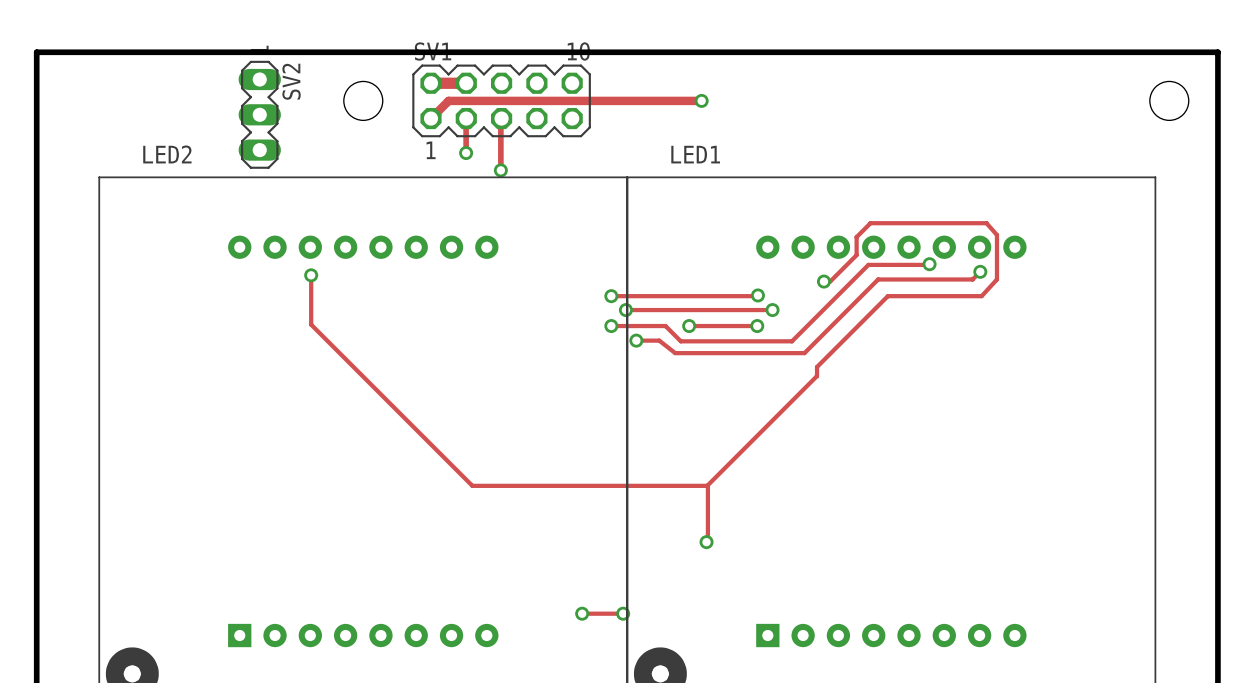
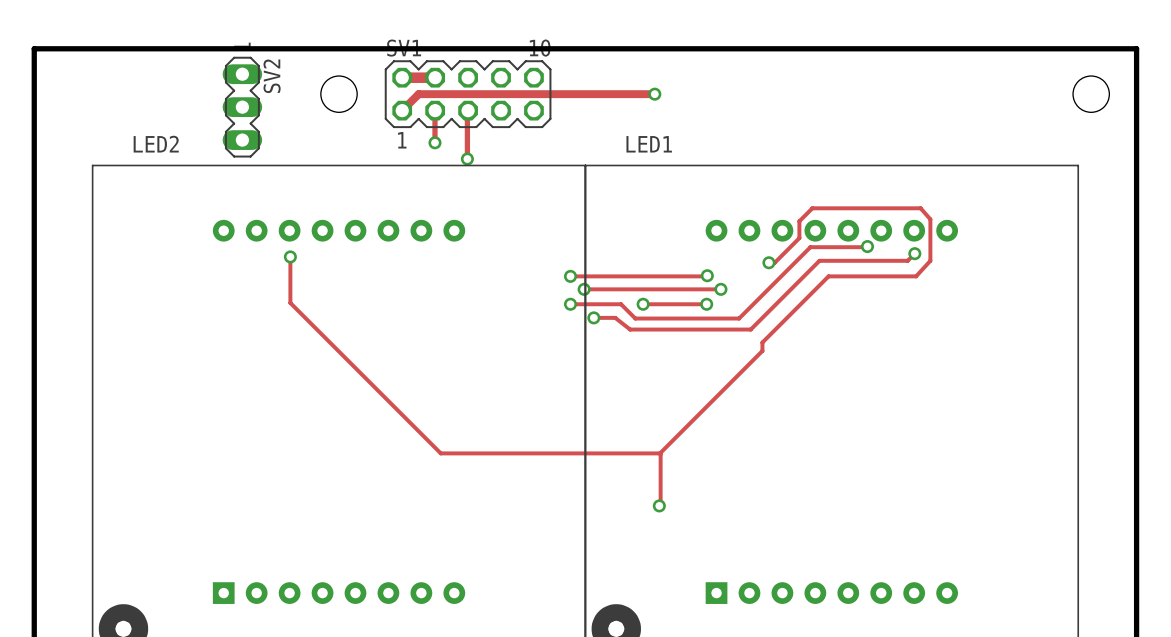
track: (582, 613) (623, 613) -> none
via: (582, 613) -> none
via: (623, 613) -> none

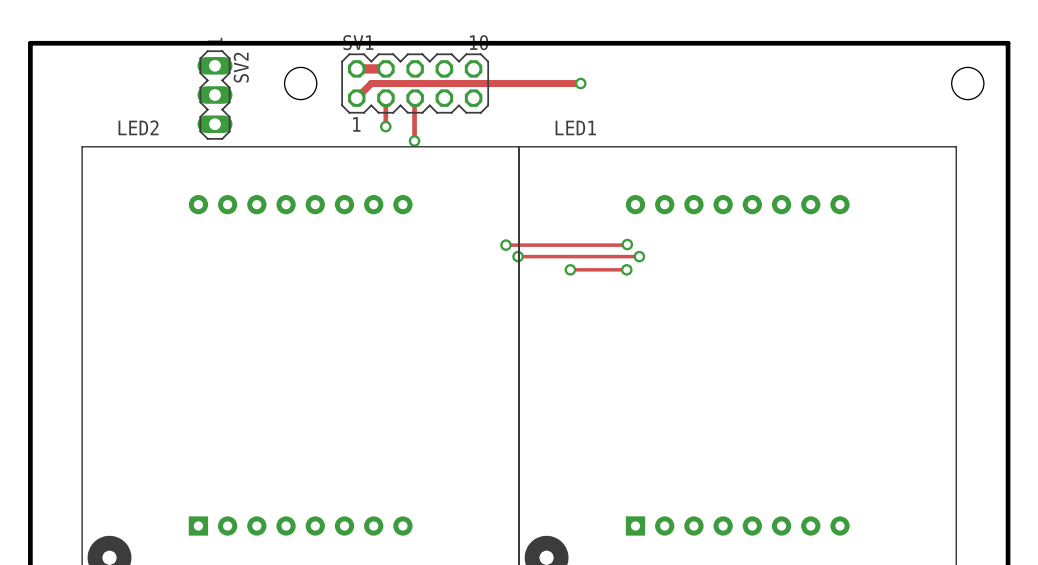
track: (867, 246) (810, 247) (739, 318) (635, 318) (621, 304) (570, 304) -> none
via: (867, 246) -> none
track: (914, 253) (907, 260) (819, 260) (750, 329) (630, 329) (615, 317) (593, 317) -> none
via: (914, 253) -> none
track: (290, 256) (290, 302) (440, 453) (659, 453) -> none
via: (290, 256) -> none
track: (768, 262) (774, 262) (799, 238) (799, 221) (812, 208) (920, 208) (930, 219) (930, 260) (916, 276) (828, 276) (762, 342) (762, 350) (659, 453) -> none
via: (768, 262) -> none
via: (570, 304) -> none
via: (593, 317) -> none
track: (659, 453) (659, 505) -> none
via: (659, 505) -> none

